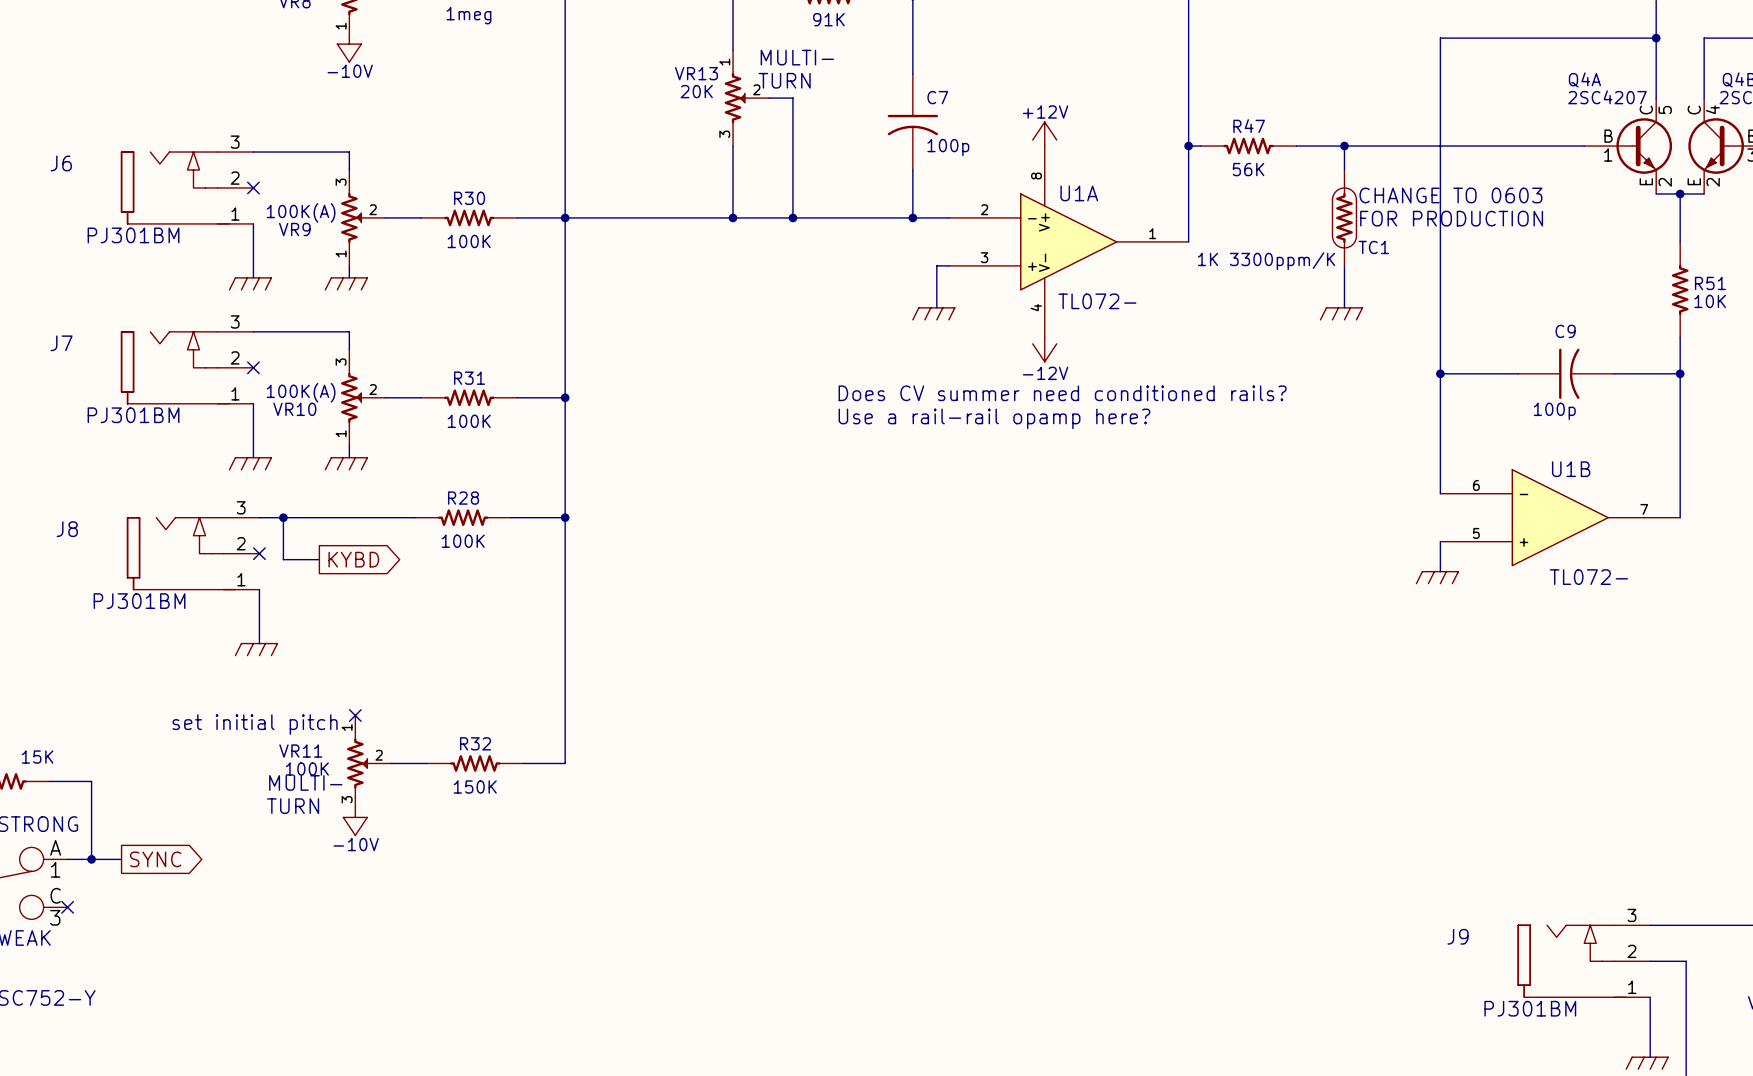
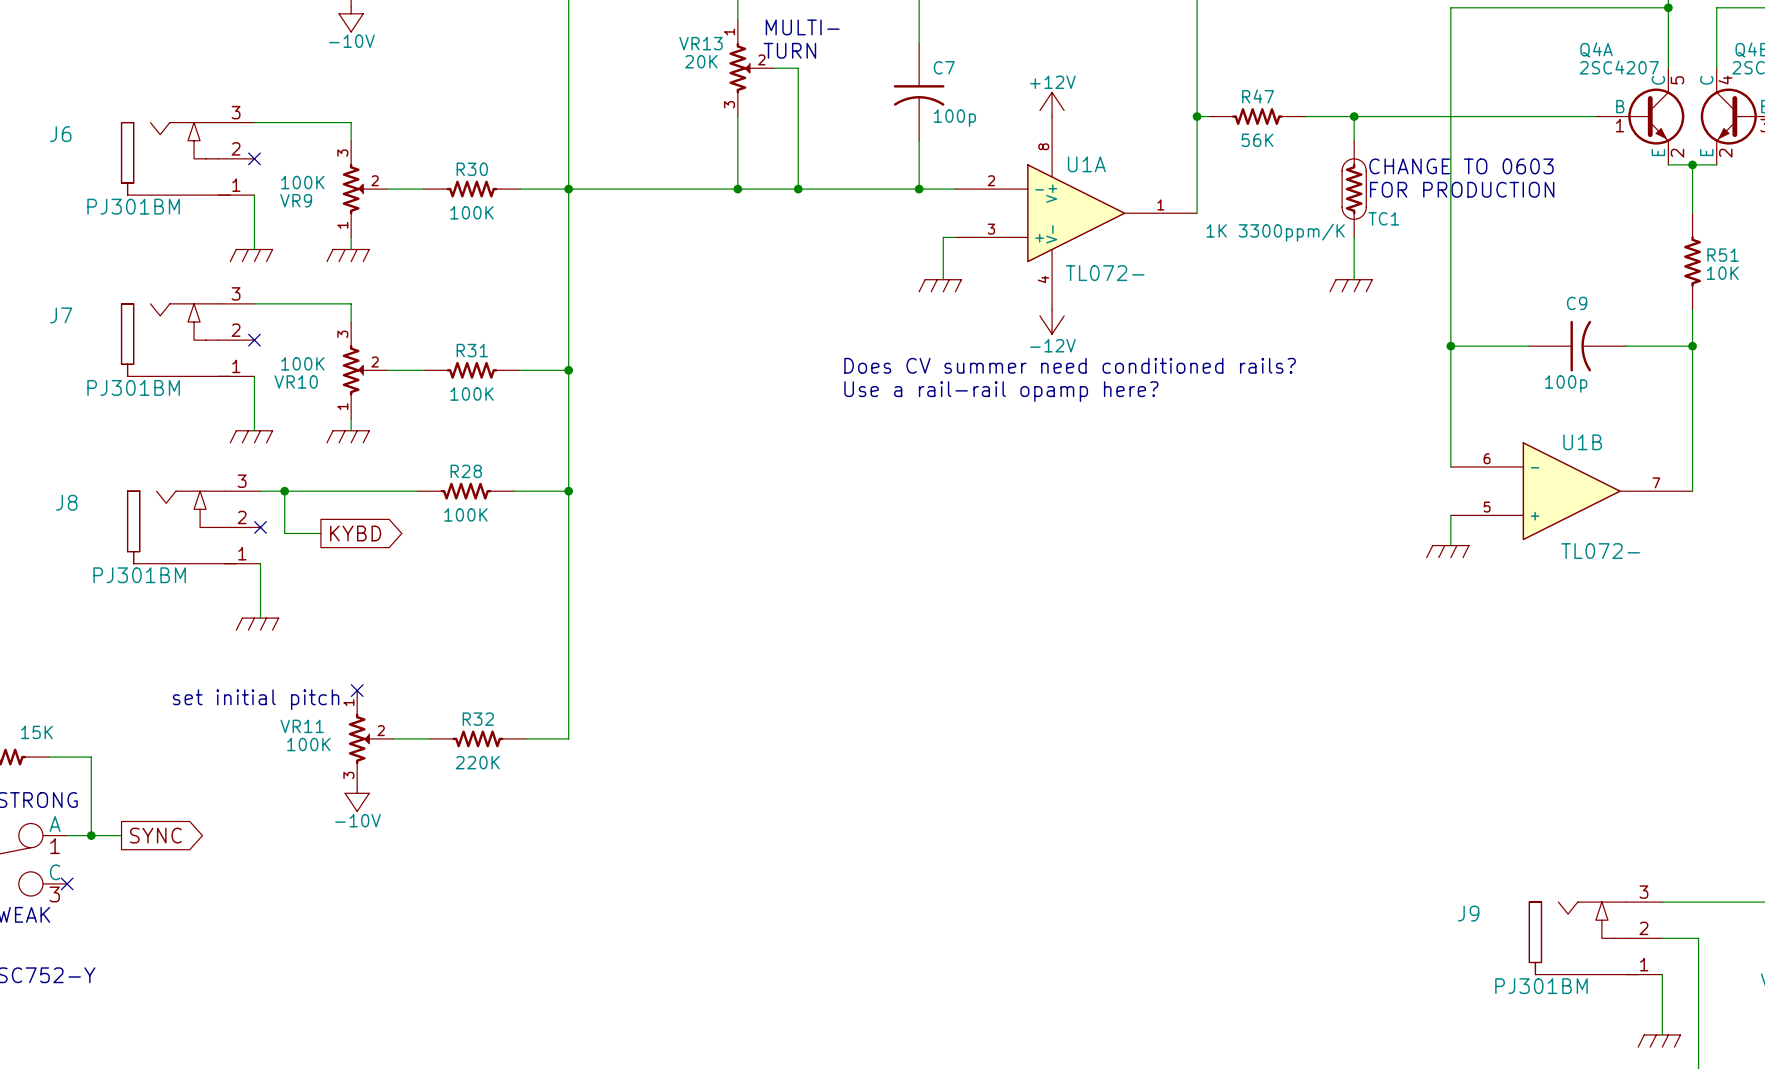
VR9 value: 100K(A) (301, 212) -> 100K (302, 182)
VR10 value: 100K(A) (301, 392) -> 100K (302, 363)
text: MULTI- (305, 782) -> none
R32 value: 150K (475, 787) -> 220K (477, 762)
text: TURN (293, 806) -> none

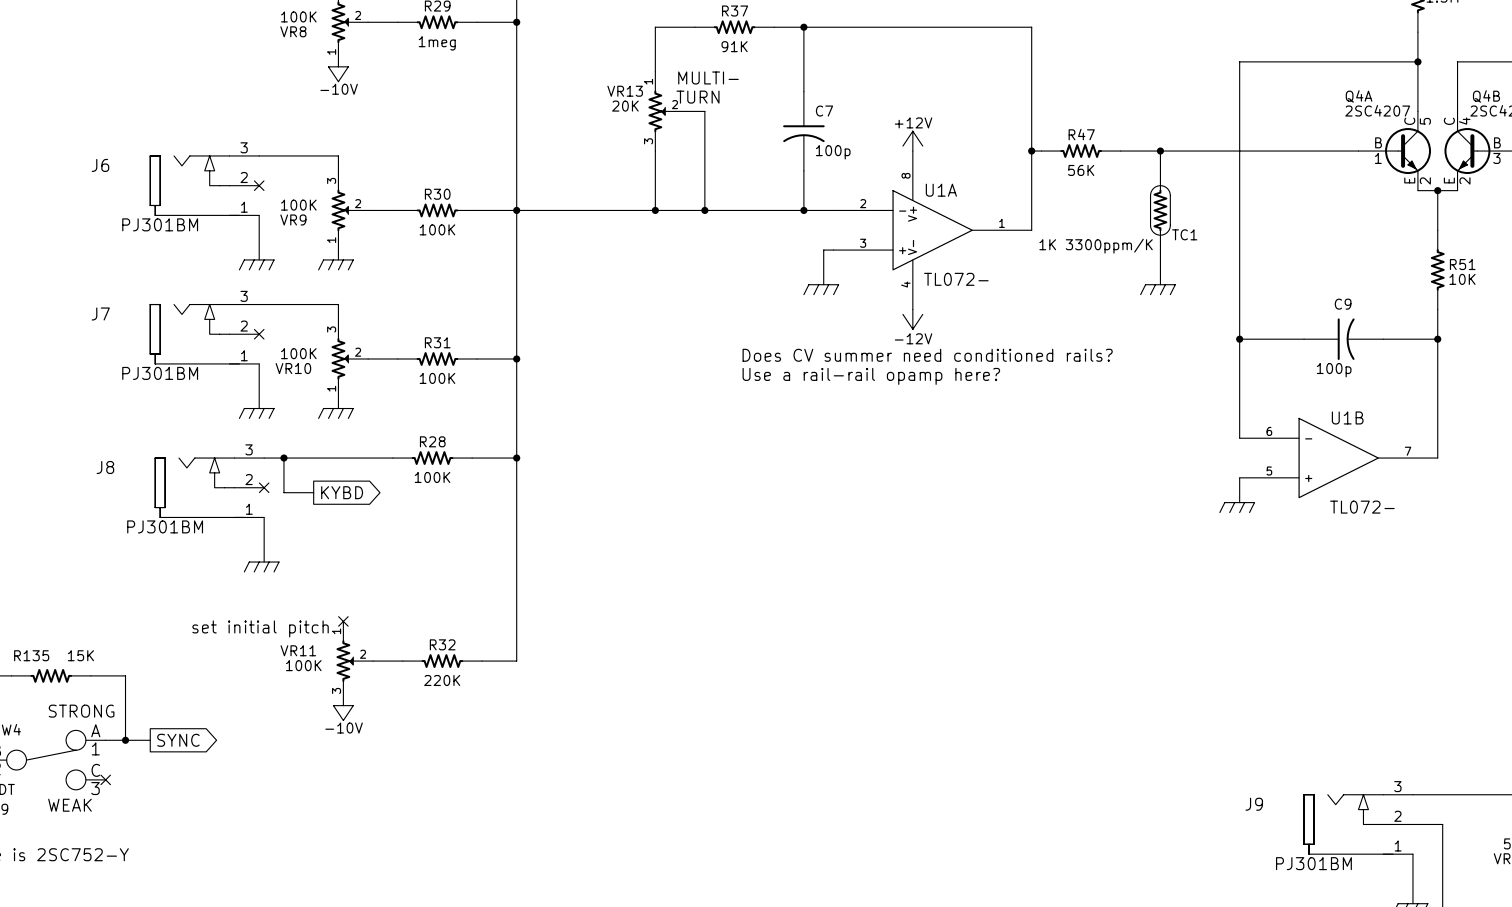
text: CHANGE TO 0603 (1461, 166) -> none
text: FOR PRODUCTION (1462, 189) -> none

